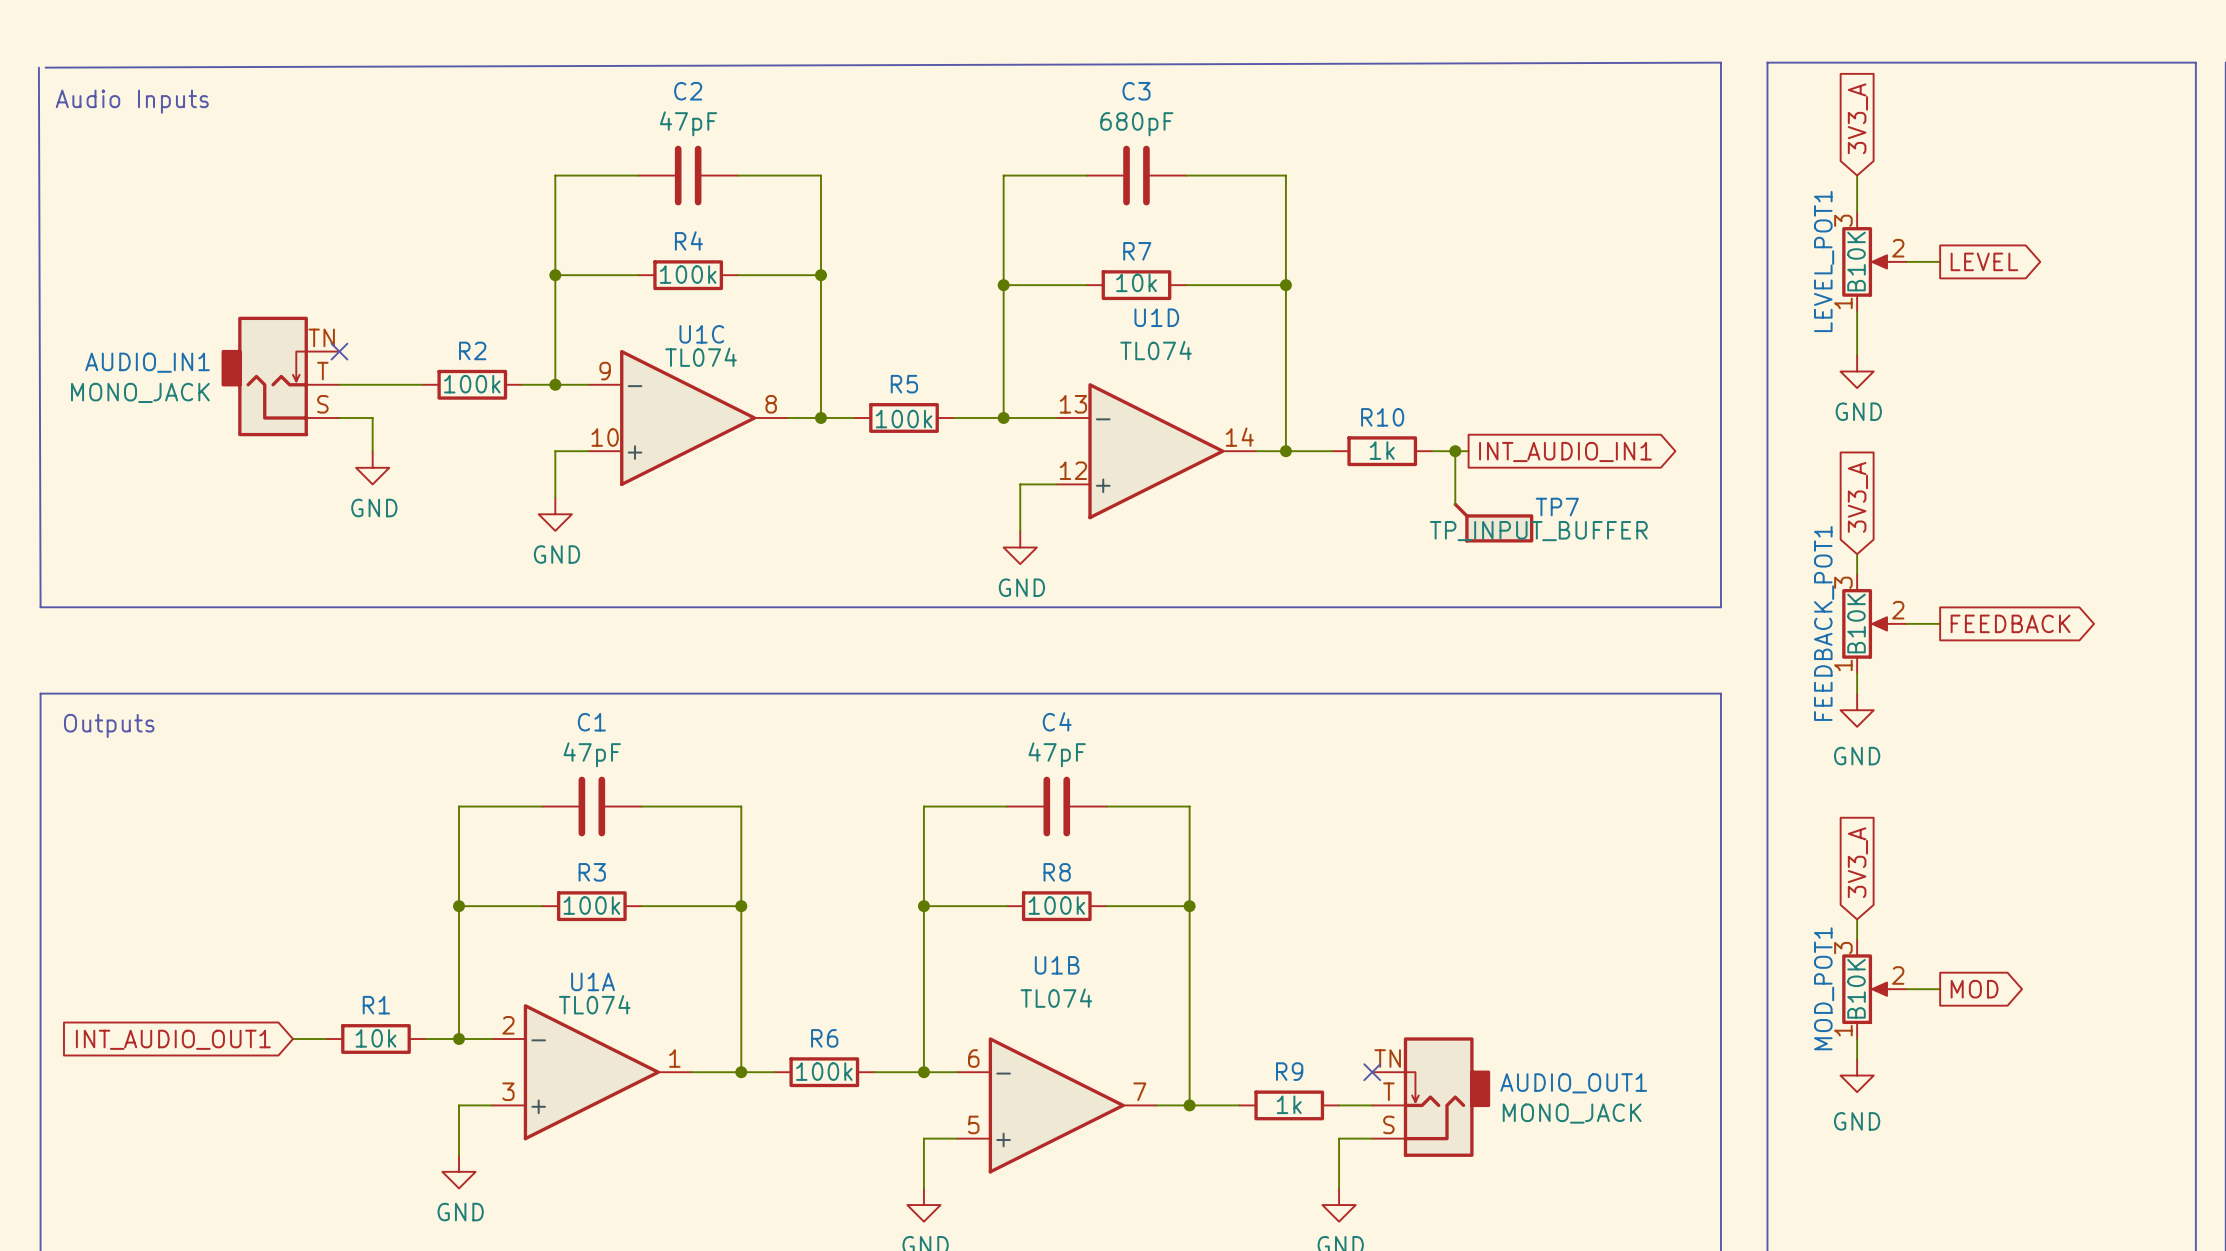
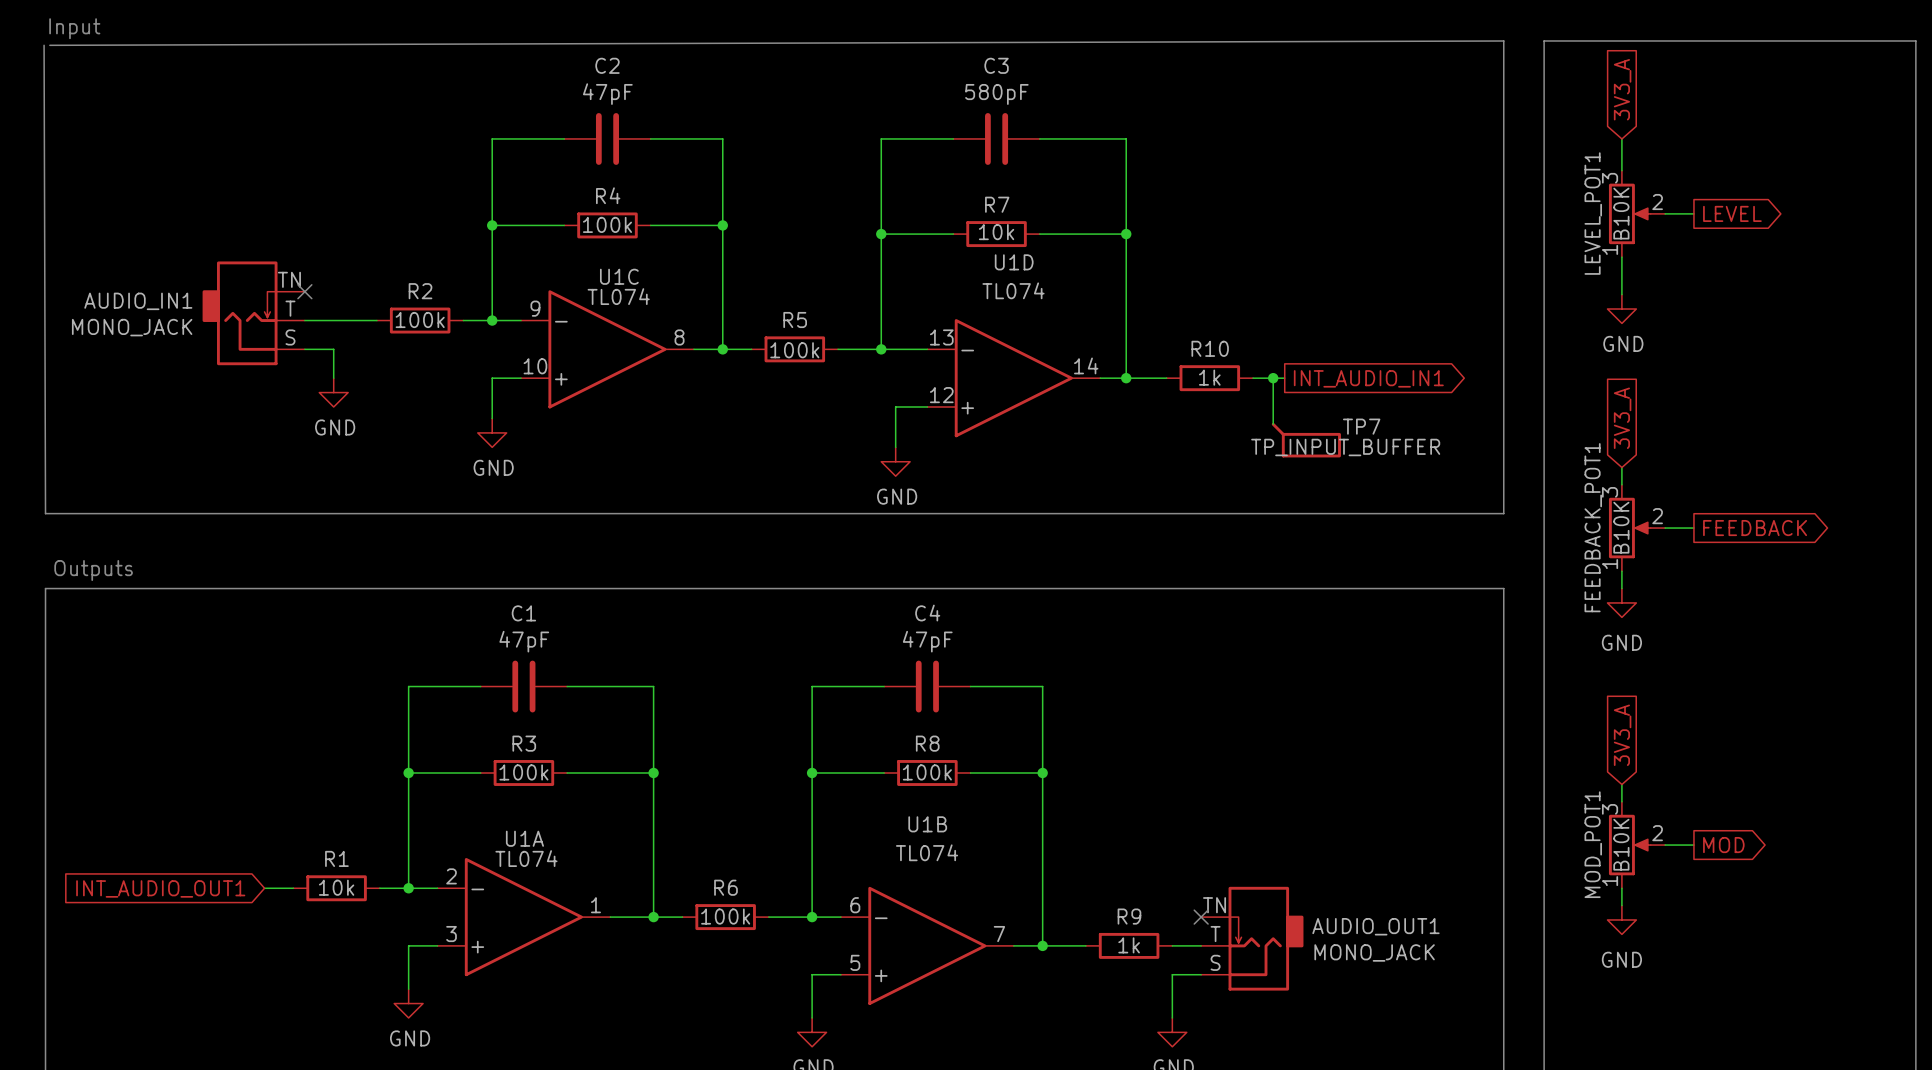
text: none -> Input (74, 28)
text: Audio Inputs (132, 101) -> none
C3 value: 680pF (1136, 124) -> 580pF (996, 94)
text position: Outputs (109, 725) -> Outputs (93, 570)

